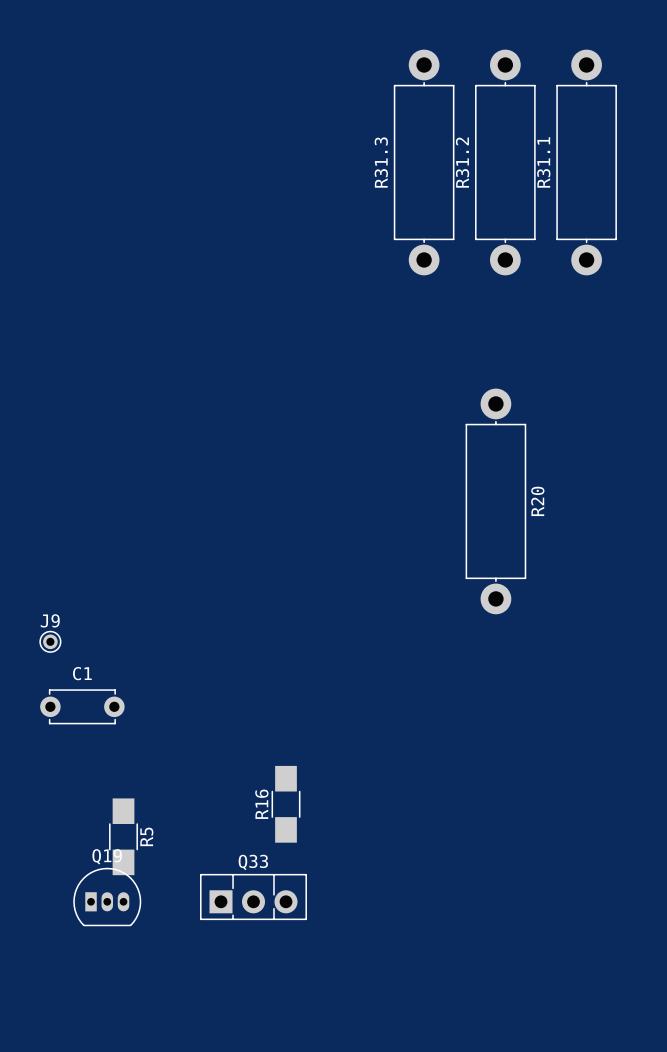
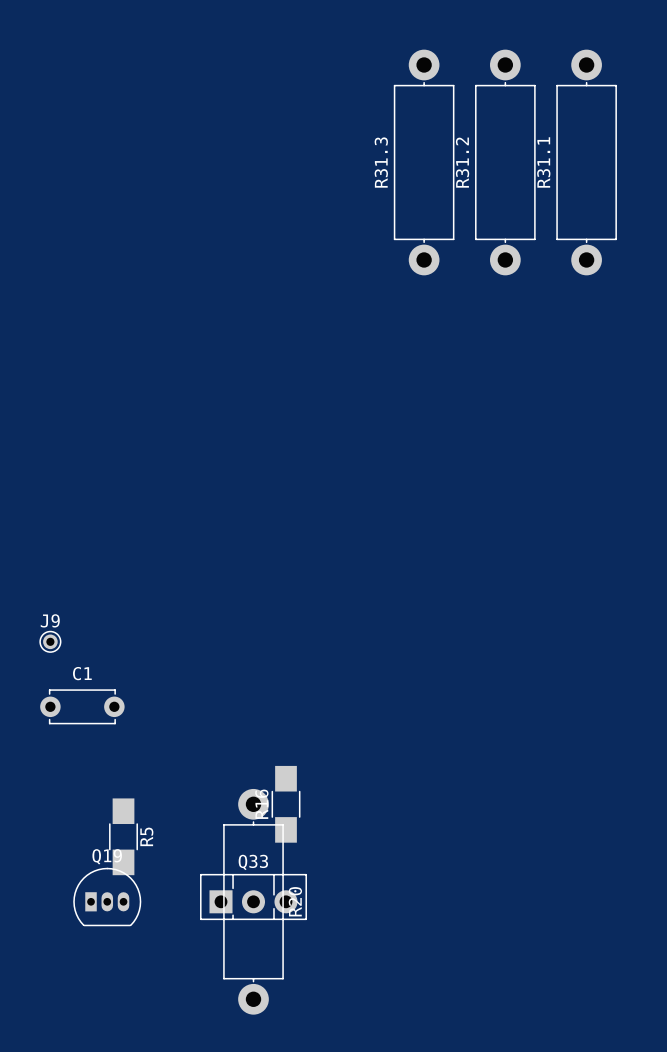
R20 position: (495, 501) -> (253, 901)

